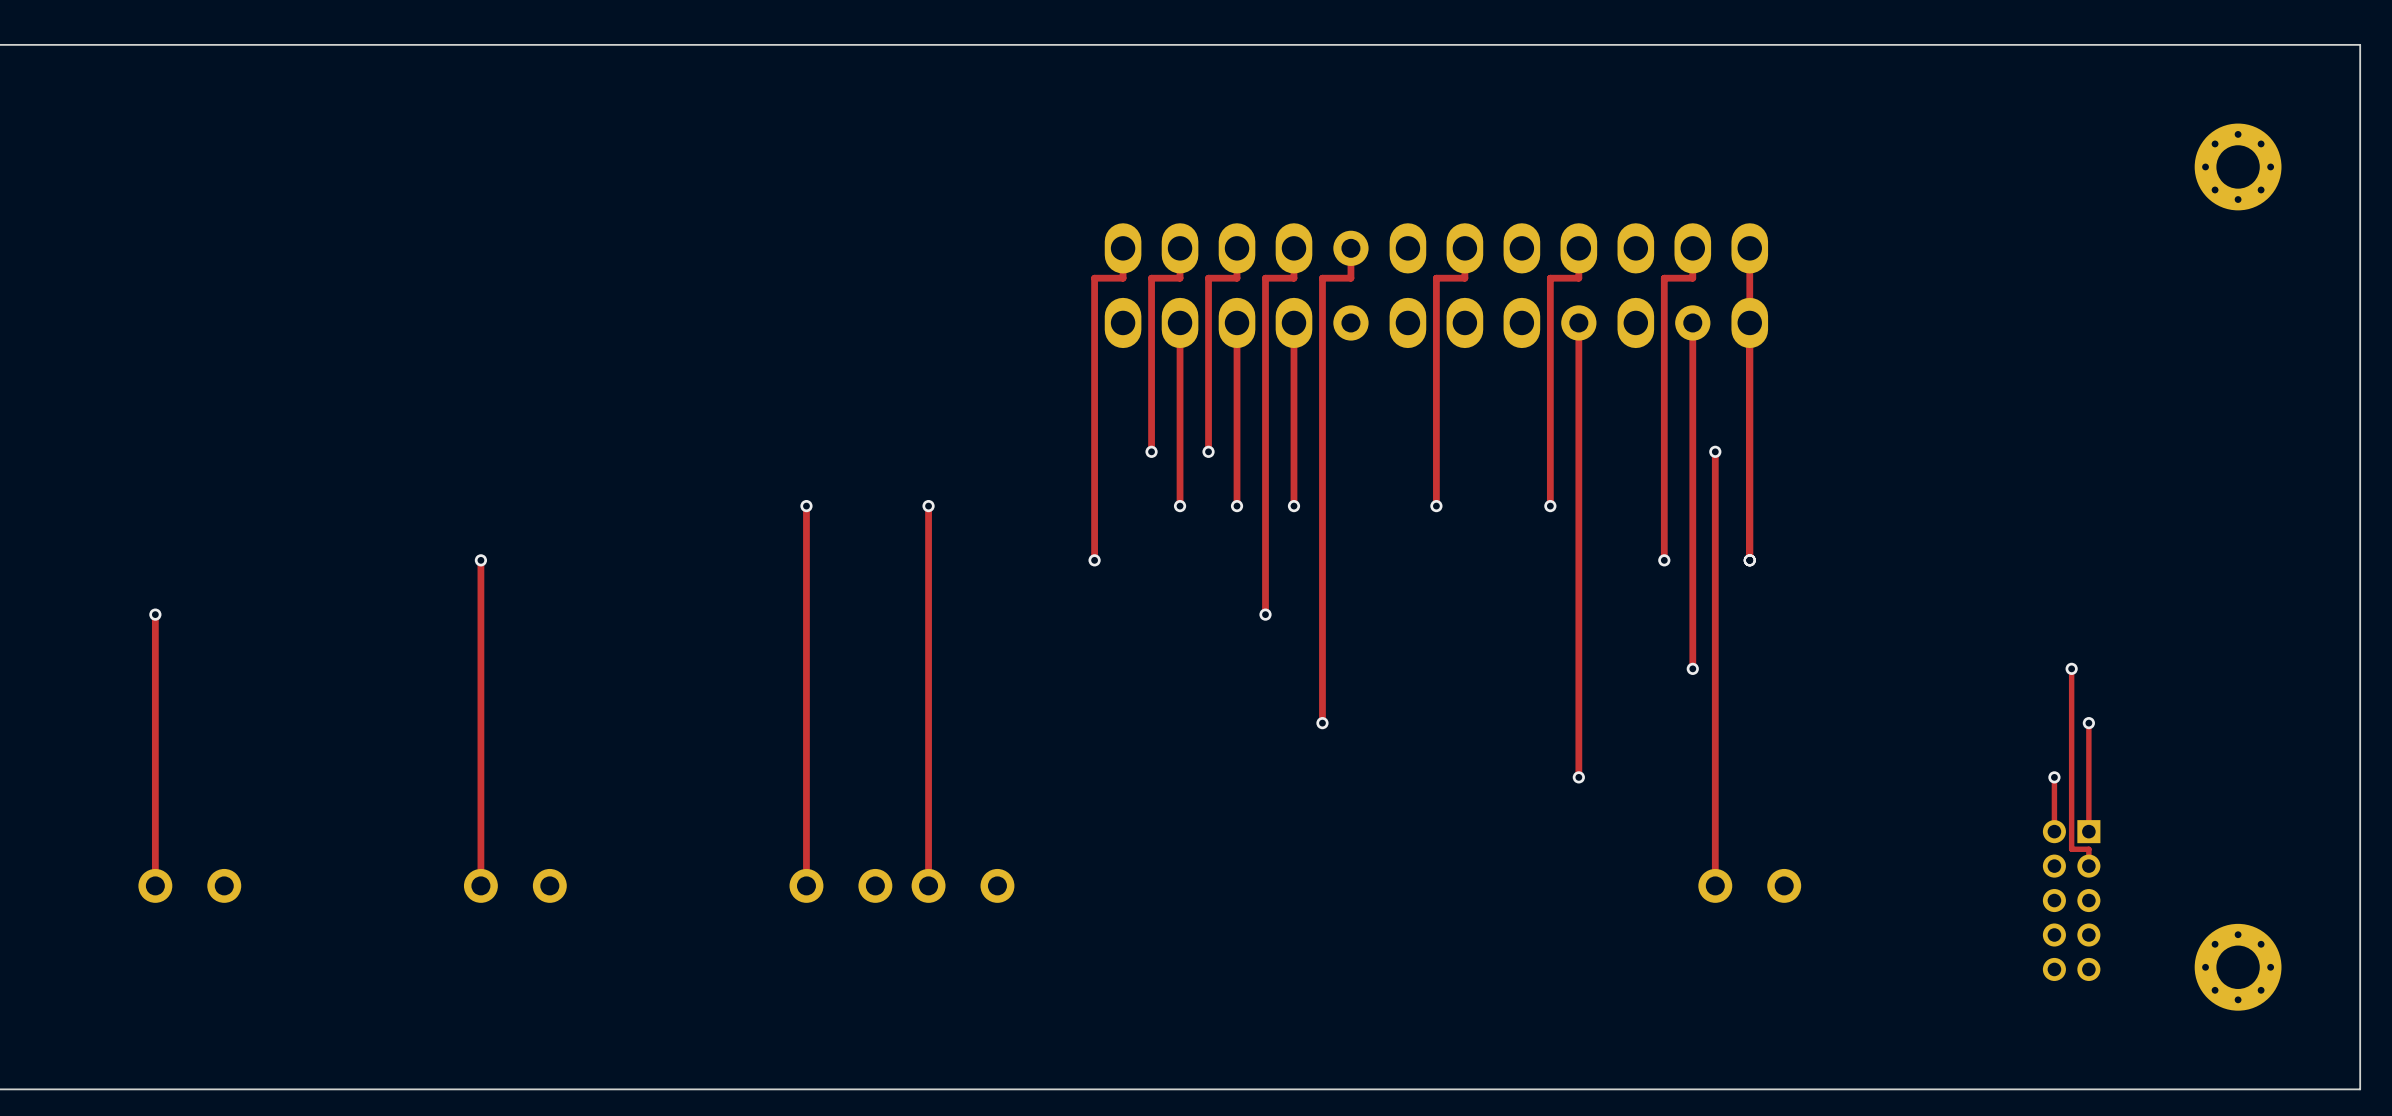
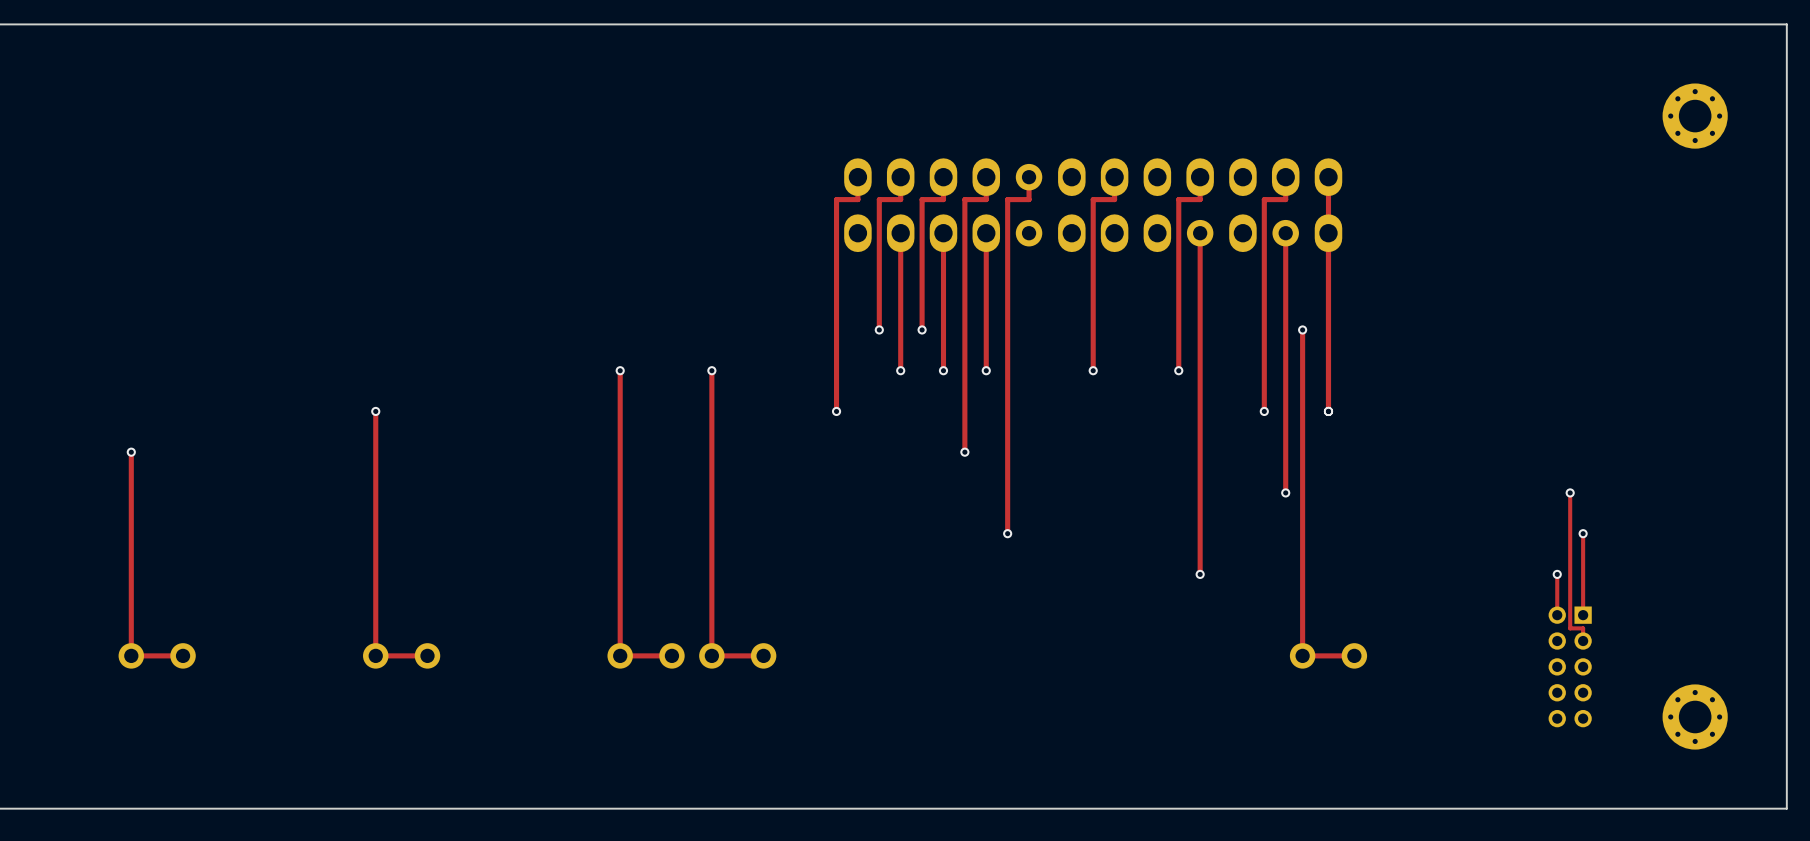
top track: none -> (183, 655) (131, 655)
top track: none -> (427, 655) (375, 655)
top track: none -> (671, 655) (620, 655)
top track: none -> (763, 655) (711, 655)
top track: none -> (1354, 655) (1302, 655)

